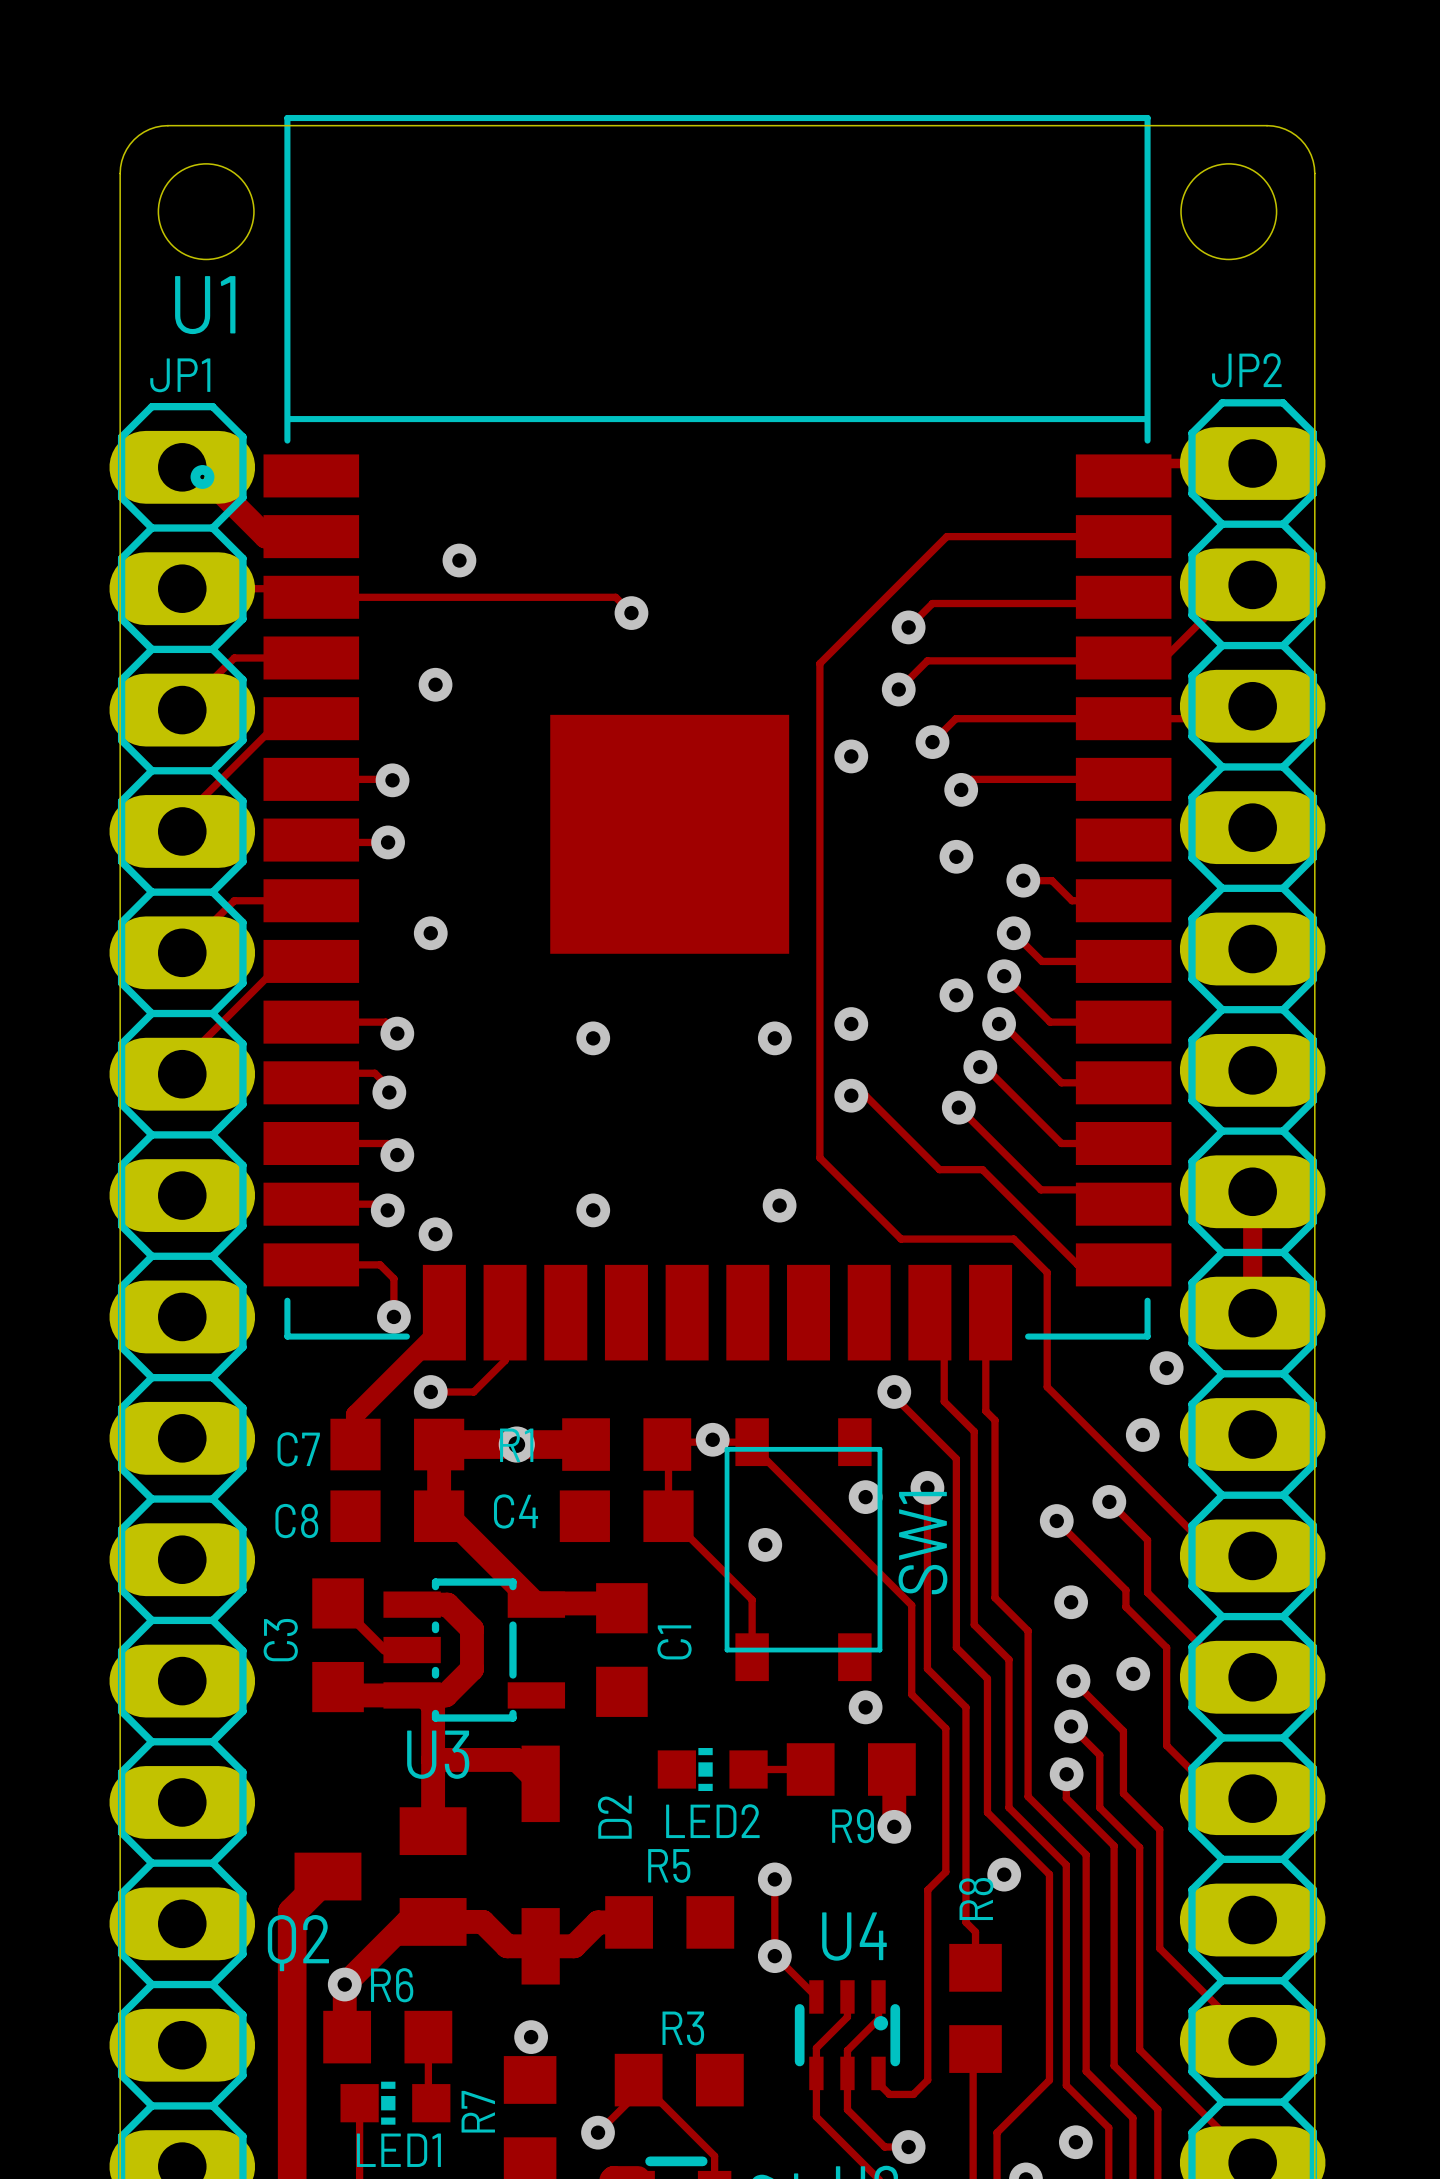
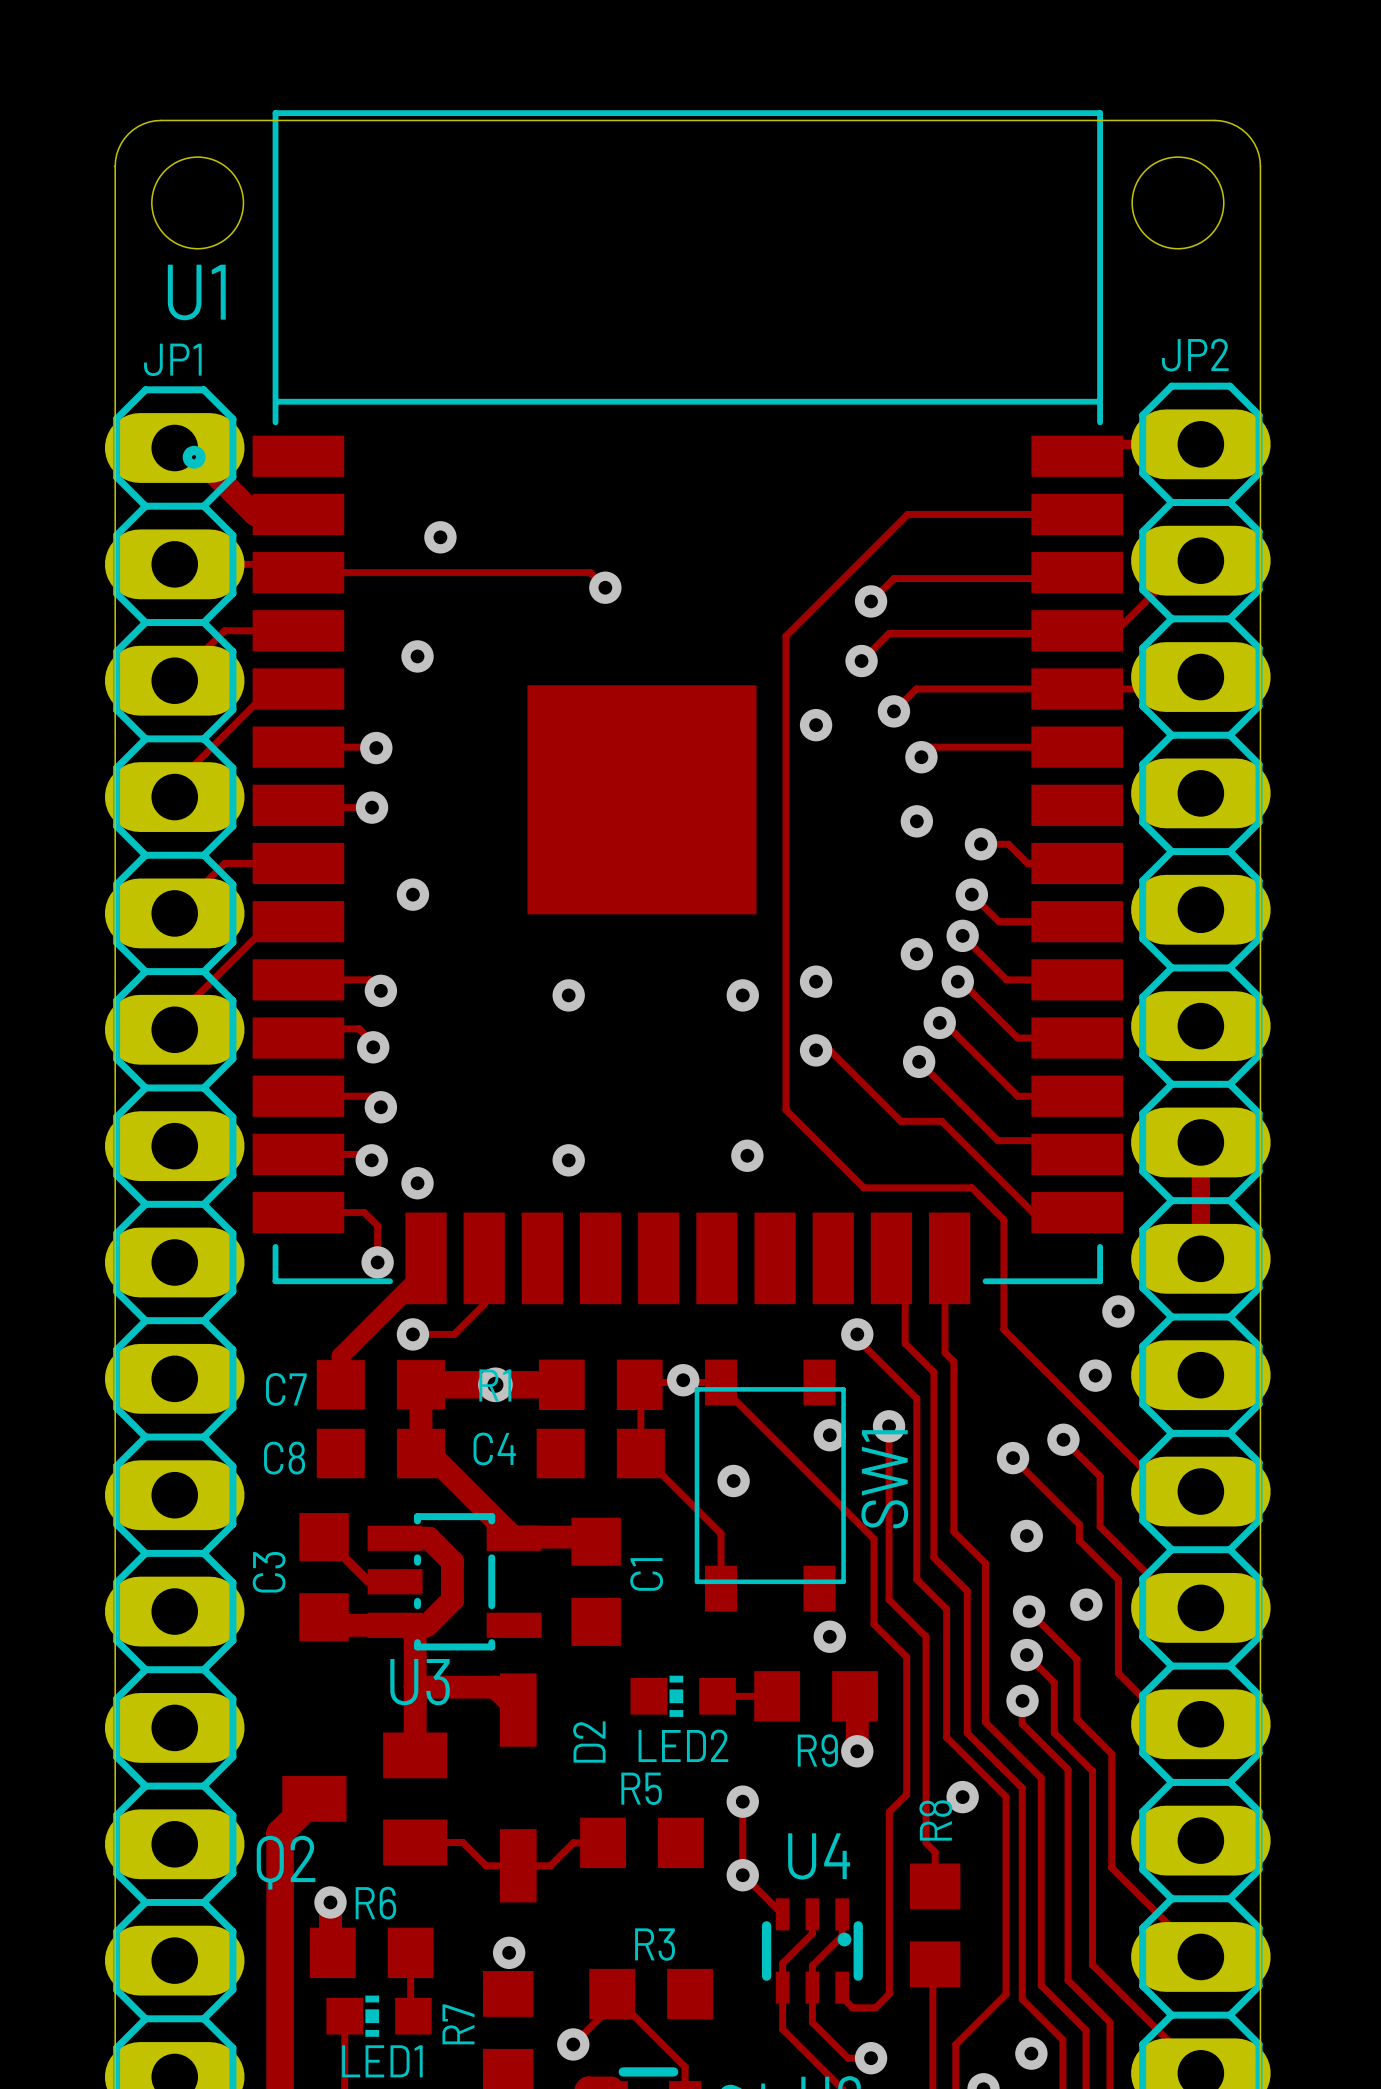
track: (433, 1921) (407, 1921) (344, 1984) -> none
track width: thick (433, 1921) (482, 1921) (507, 1946) (574, 1946) (598, 1922) (629, 1922) -> thin (415, 1842) (462, 1842) (486, 1865) (550, 1865) (573, 1842) (603, 1842)

